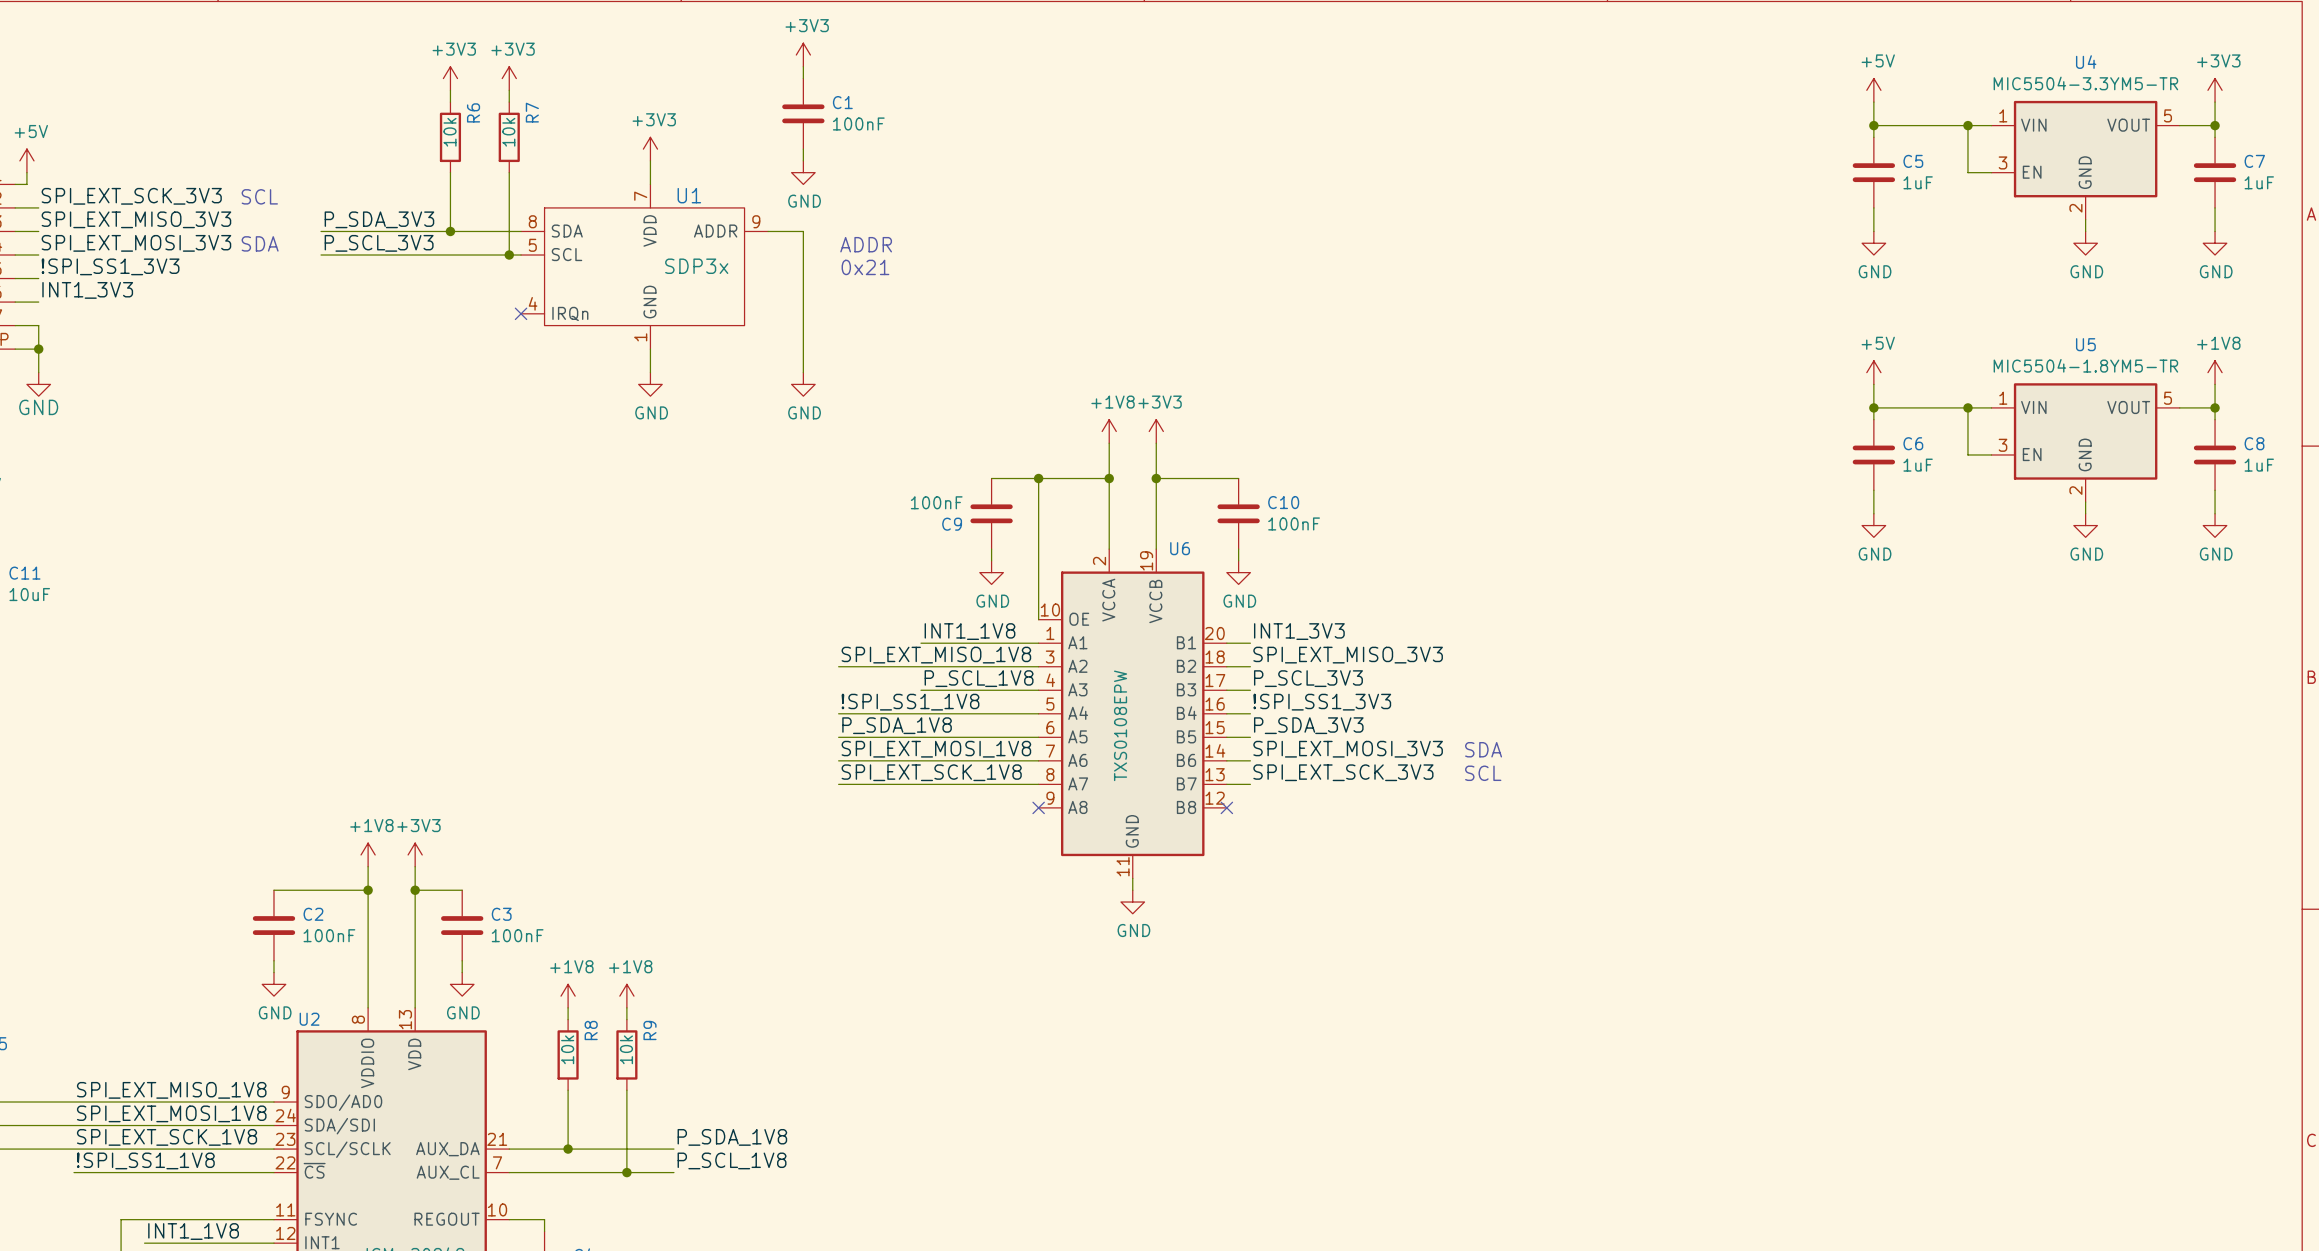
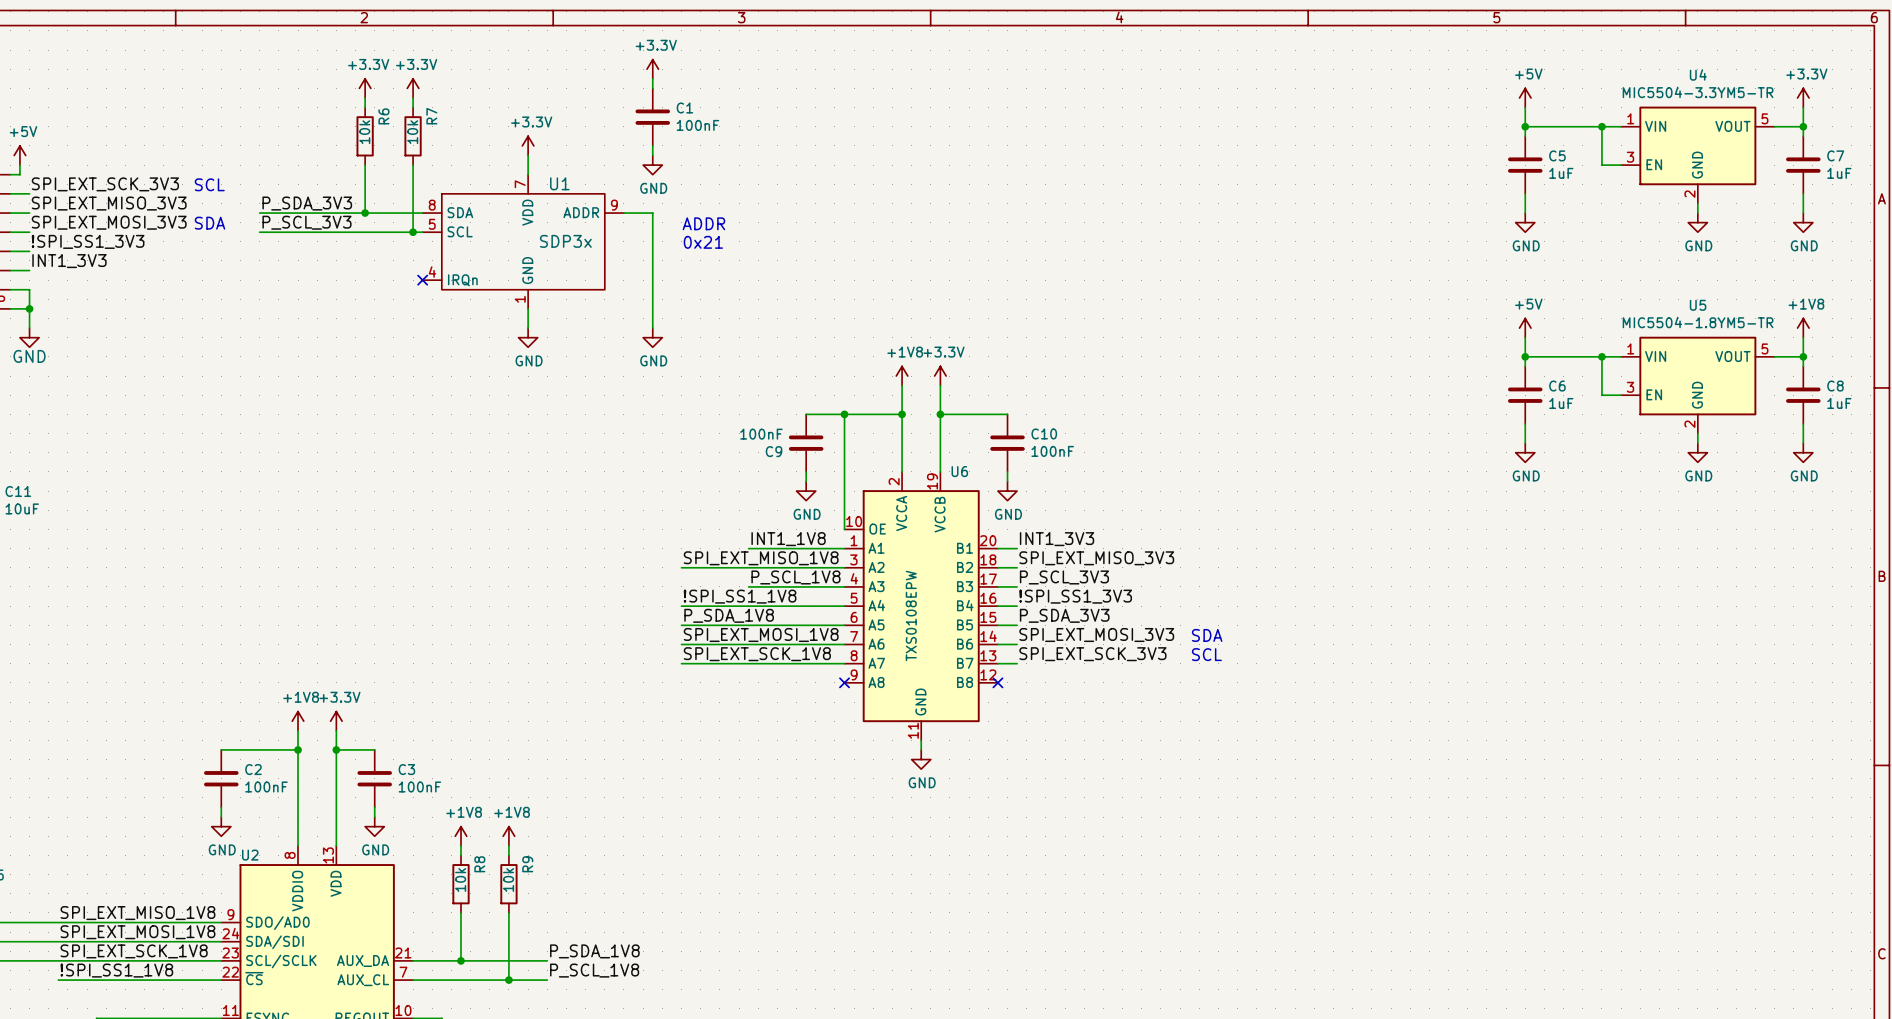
power symbol: +3V3 (803, 55) -> +3.3V (652, 69)
power symbol: +3V3 (450, 78) -> +3.3V (365, 88)
power symbol: +3V3 (509, 78) -> +3.3V (413, 88)
power symbol: +3V3 (2215, 90) -> +3.3V (1803, 97)
power symbol: +3V3 (650, 149) -> +3.3V (528, 145)
power symbol: +3V3 (1156, 431) -> +3.3V (940, 376)
power symbol: +3V3 (415, 854) -> +3.3V (336, 721)

